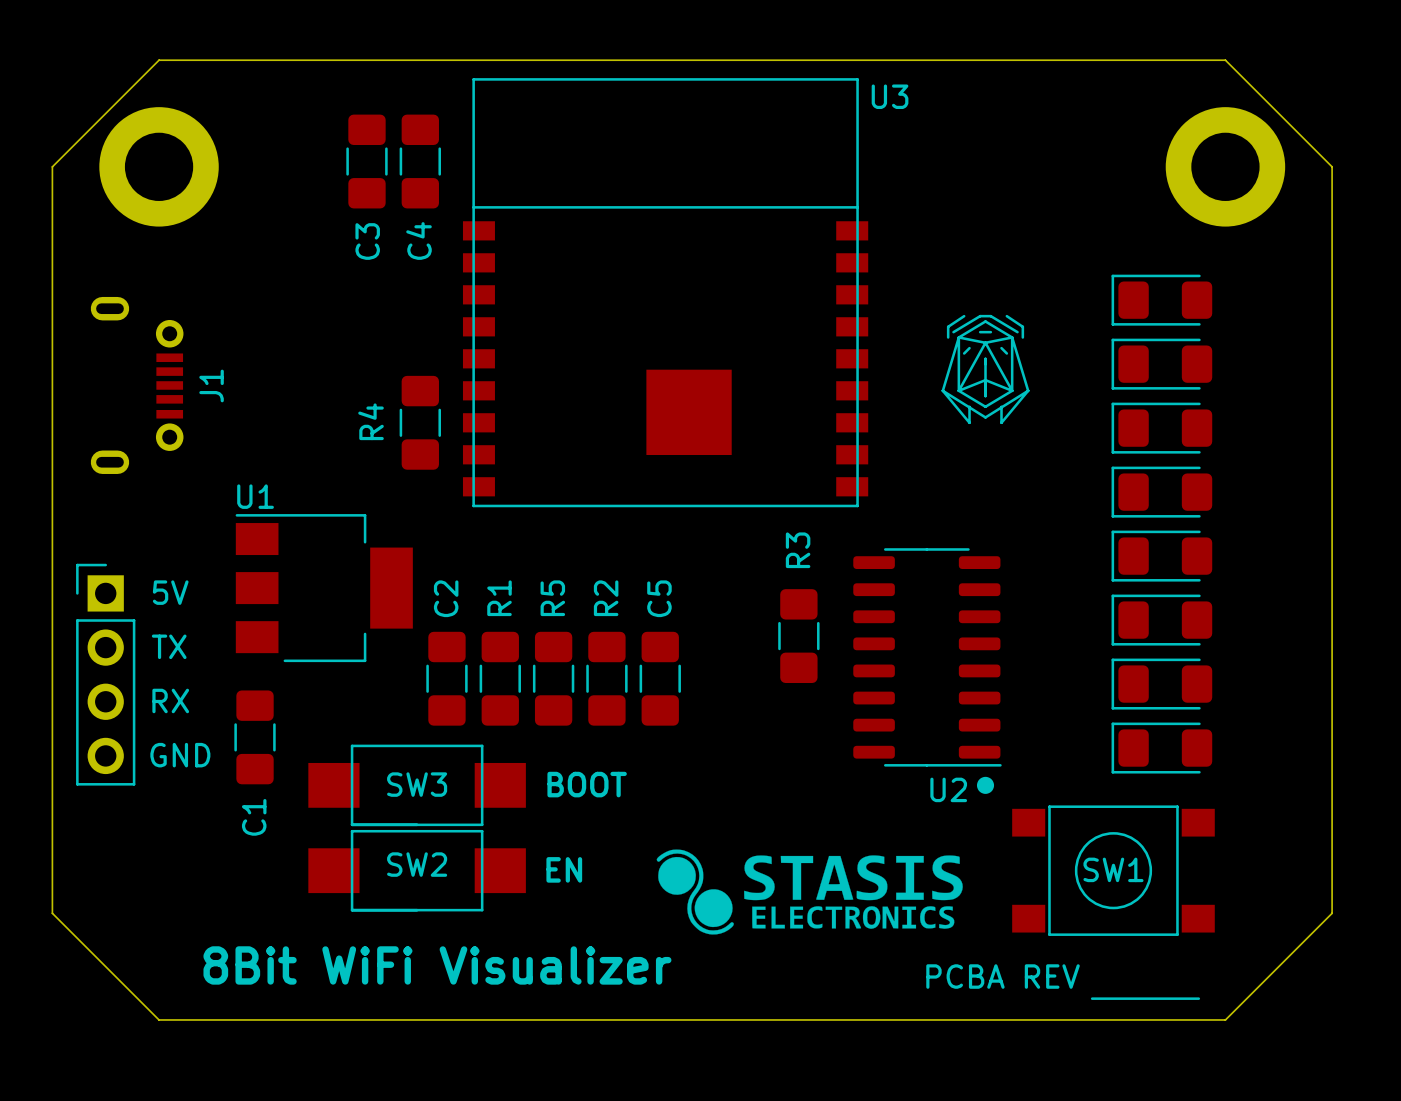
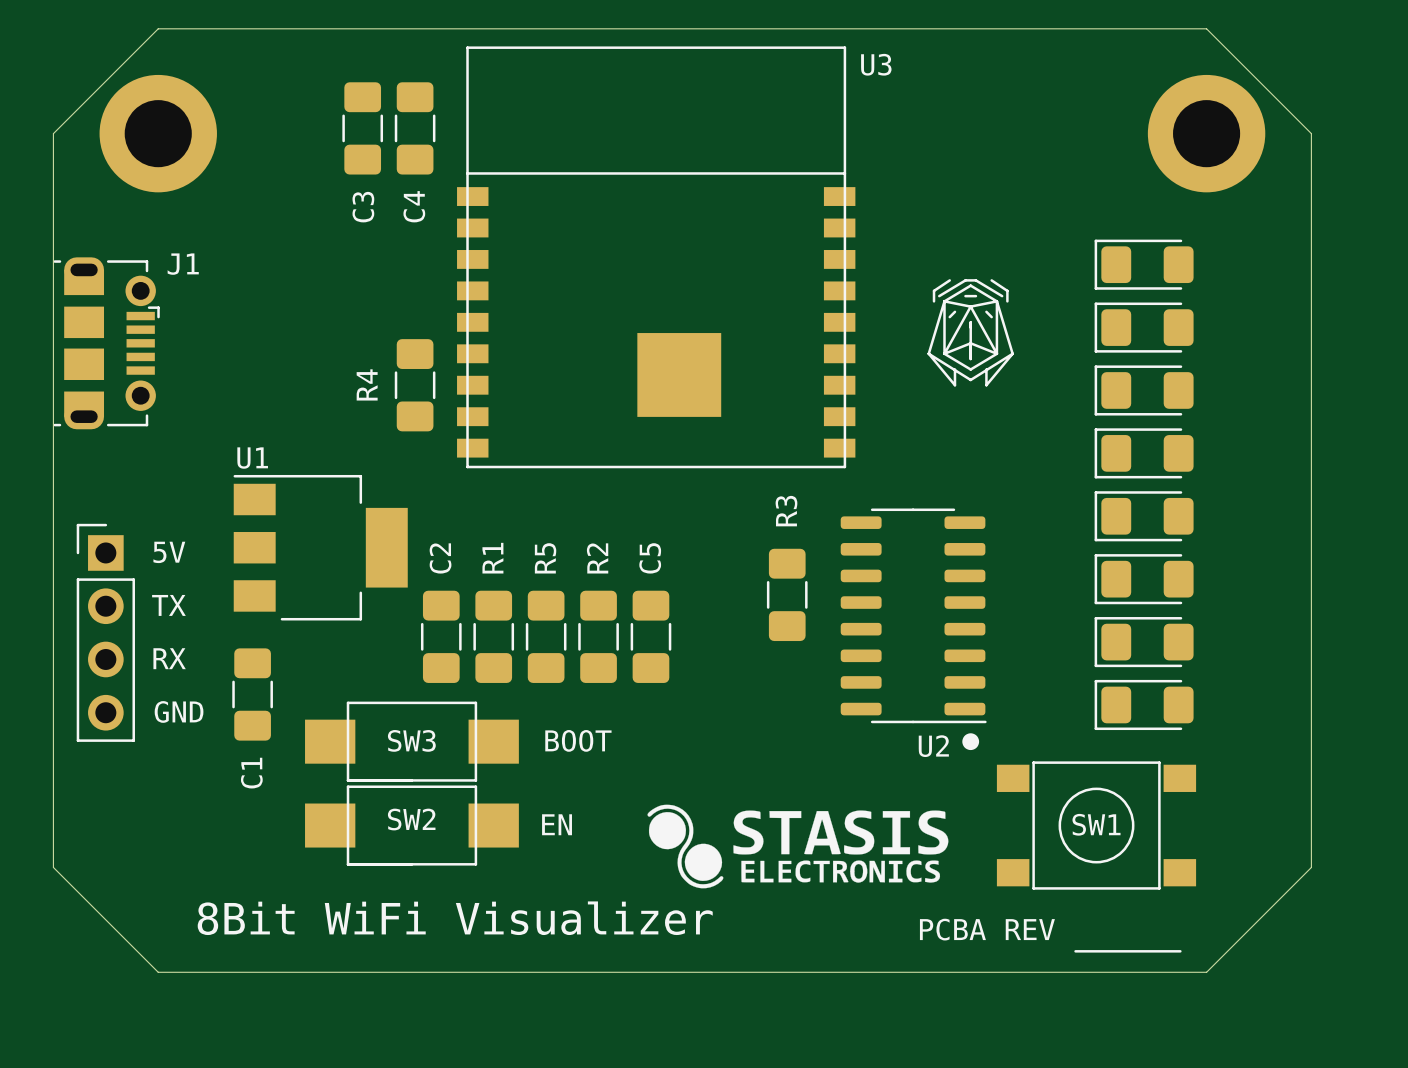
J1 footprint: [90, 296, 184, 474] -> [53, 257, 160, 430]
J1 name position: J1 (211, 385) -> J1 (183, 264)

